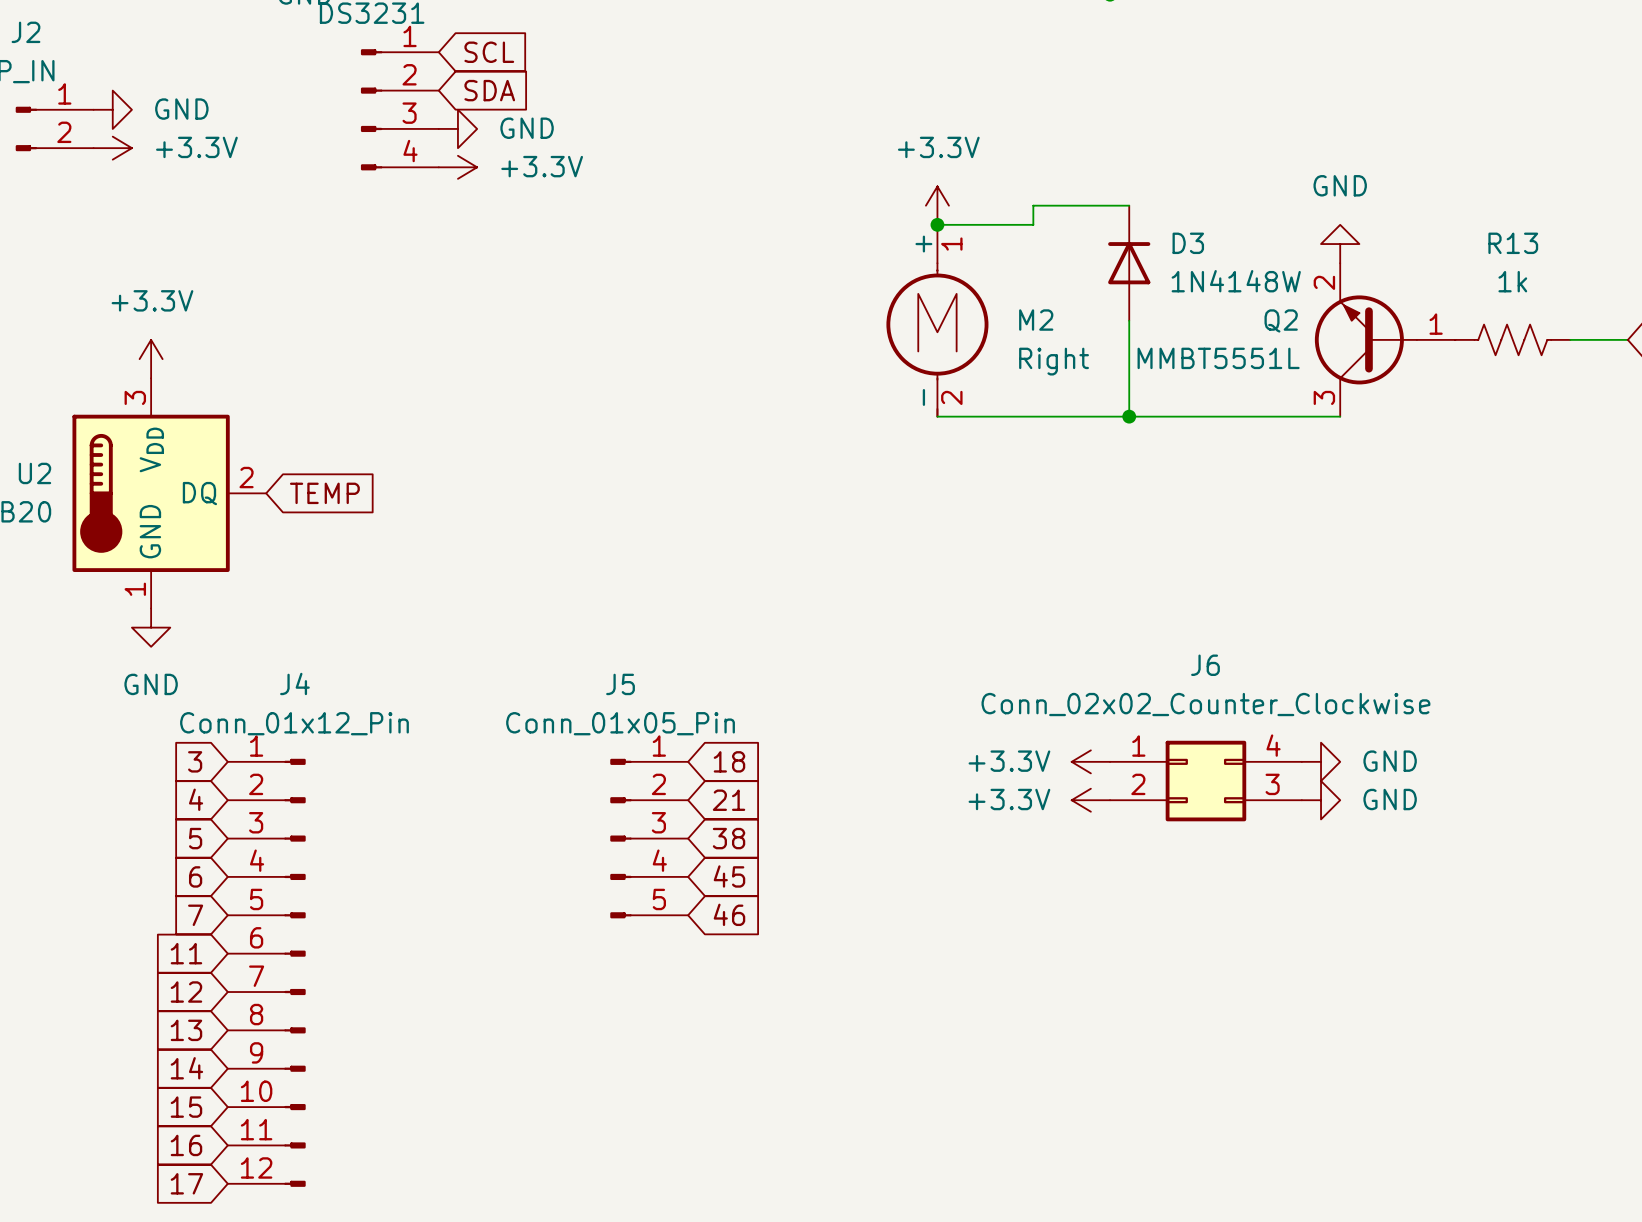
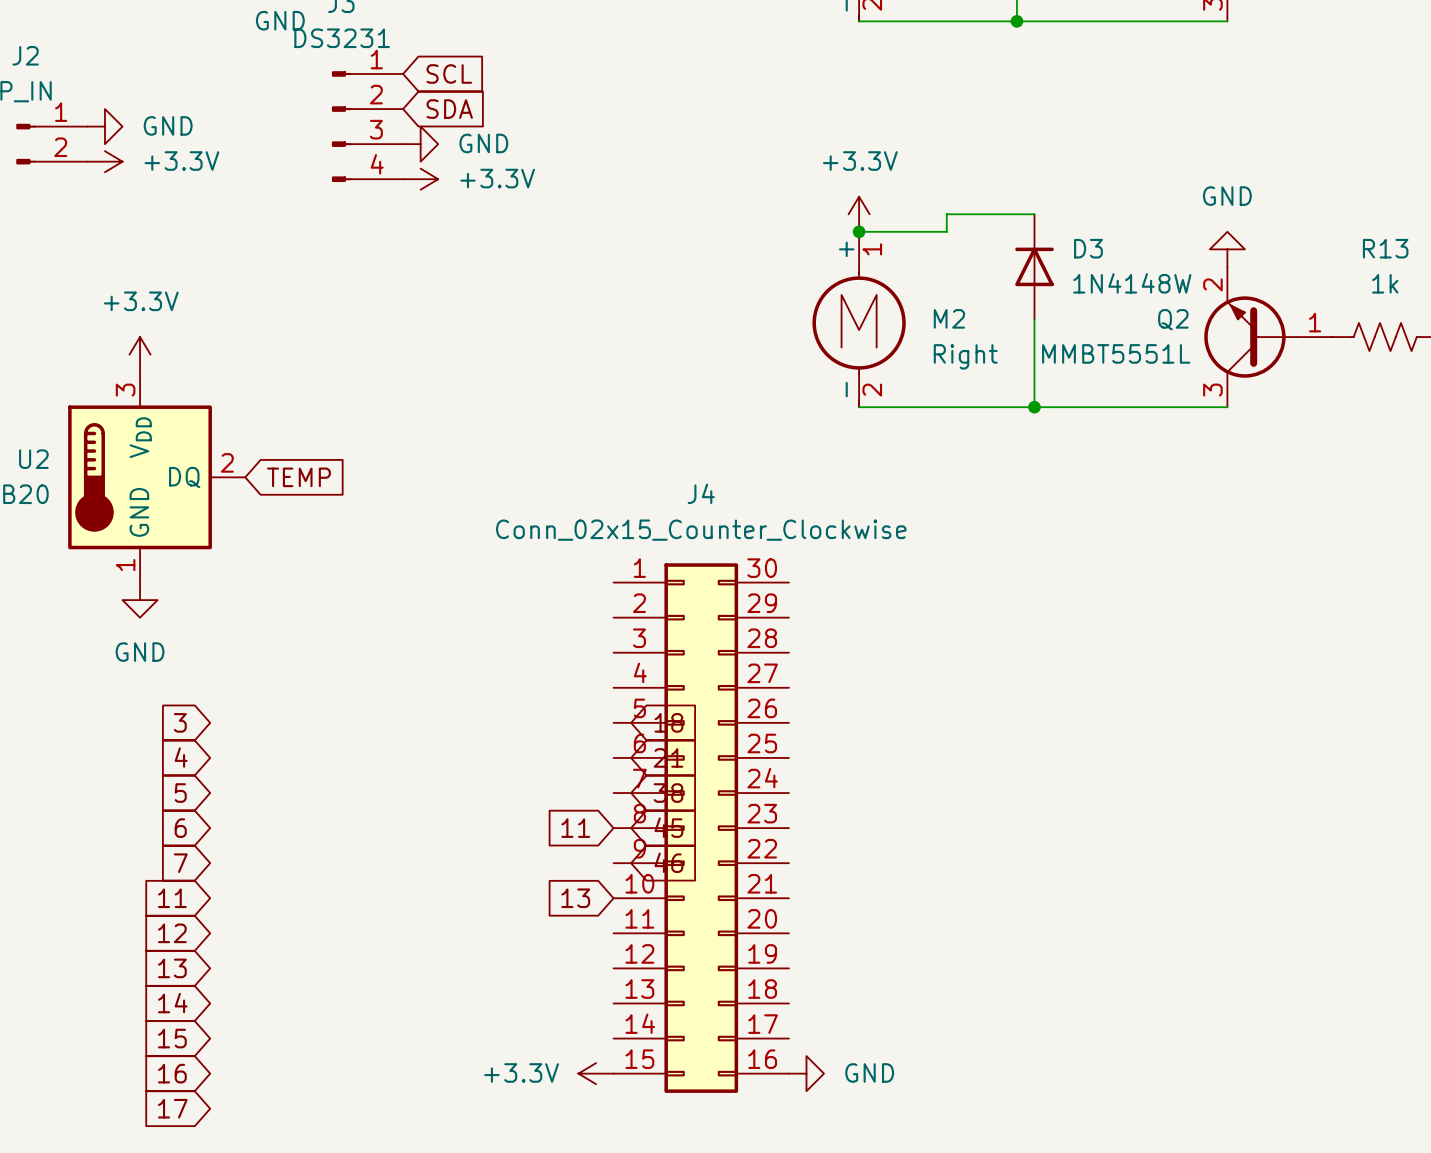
J4 name position: J4 (294, 683) -> J4 (701, 493)
J4 value: Conn_01x12_Pin (294, 723) -> Conn_02x15_Counter_Clockwise (701, 530)
J4 symbol: [227, 758, 306, 1187] -> [613, 563, 789, 1093]
power symbol: +3.3V (1090, 761) -> none
power symbol: GND (1321, 761) -> none
J6: Conn_02x02_Counter_Clockwise (1205, 781) -> none
power symbol: +3.3V (1090, 800) -> none
power symbol: GND (1321, 800) -> none
J5: Conn_01x05_Pin (649, 838) -> none
global label: none -> 11 (575, 828)
global label: none -> 13 (575, 898)
power symbol: none -> +3.3V (596, 1073)
power symbol: none -> GND (806, 1073)

